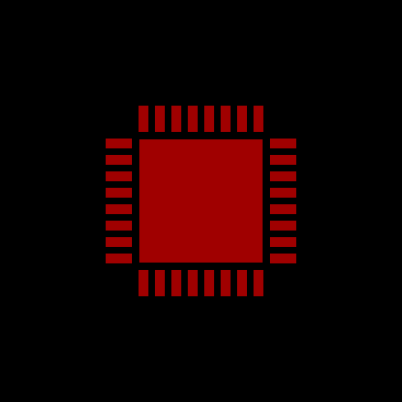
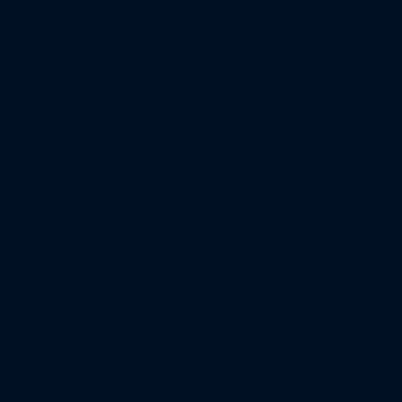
part: (200, 200) -> none

